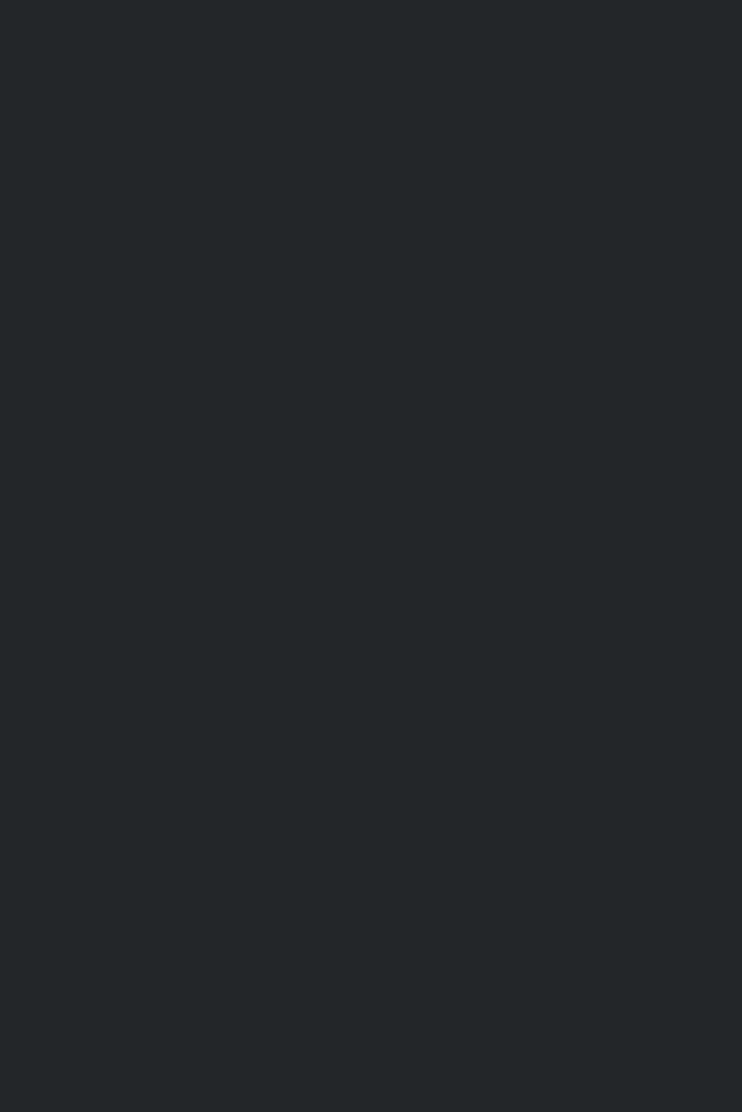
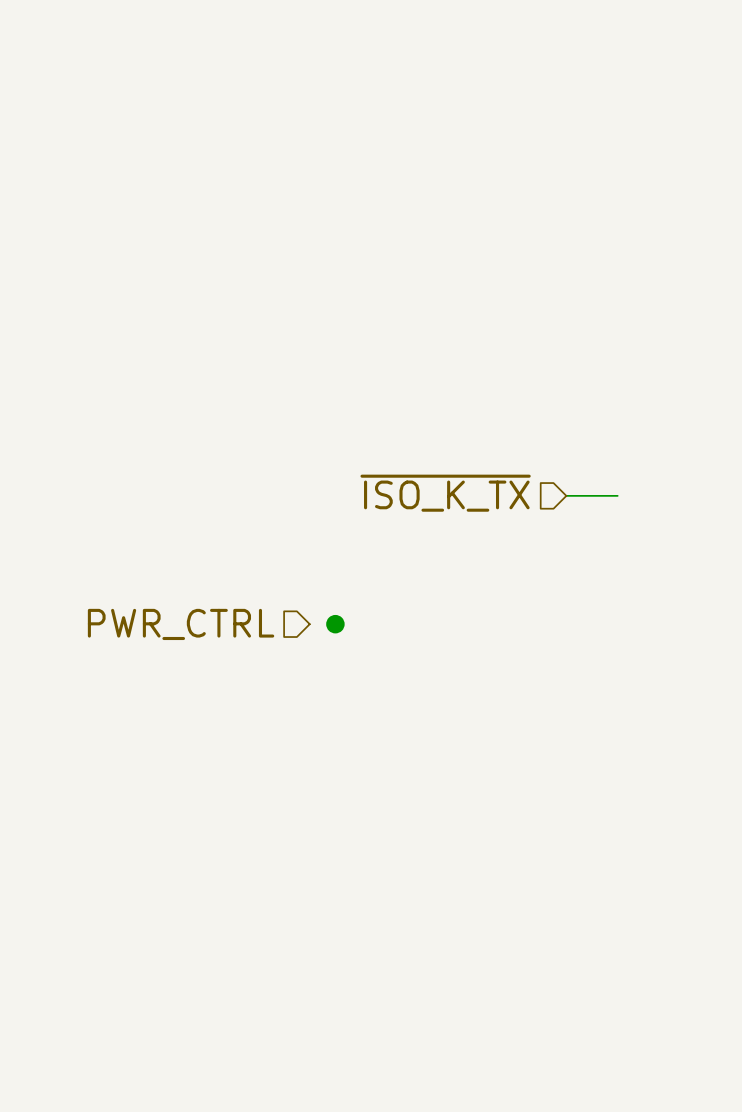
hierarchical label: none -> ~{ISO_K_TX} (445, 493)
wire: none -> (566, 495) (617, 495)
junction: none -> (335, 624)
hierarchical label: none -> PWR_CTRL (181, 624)

